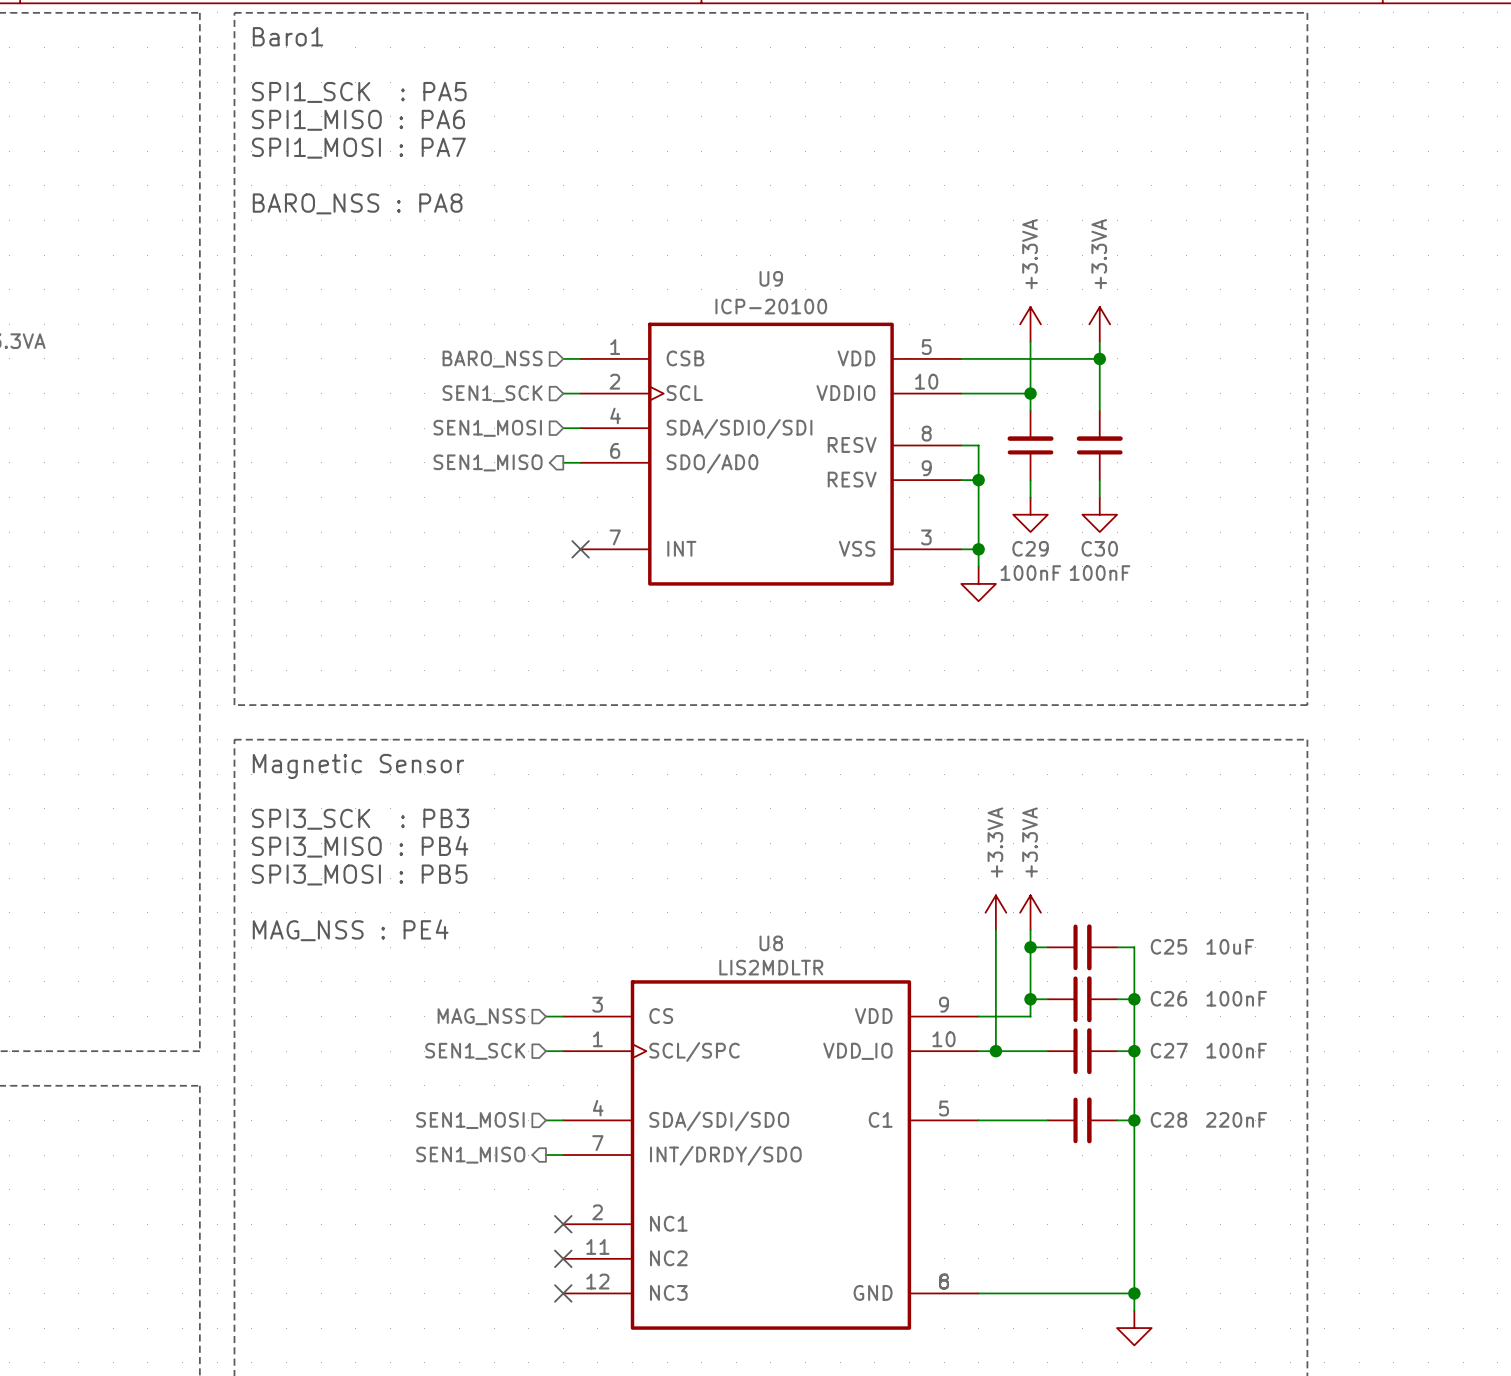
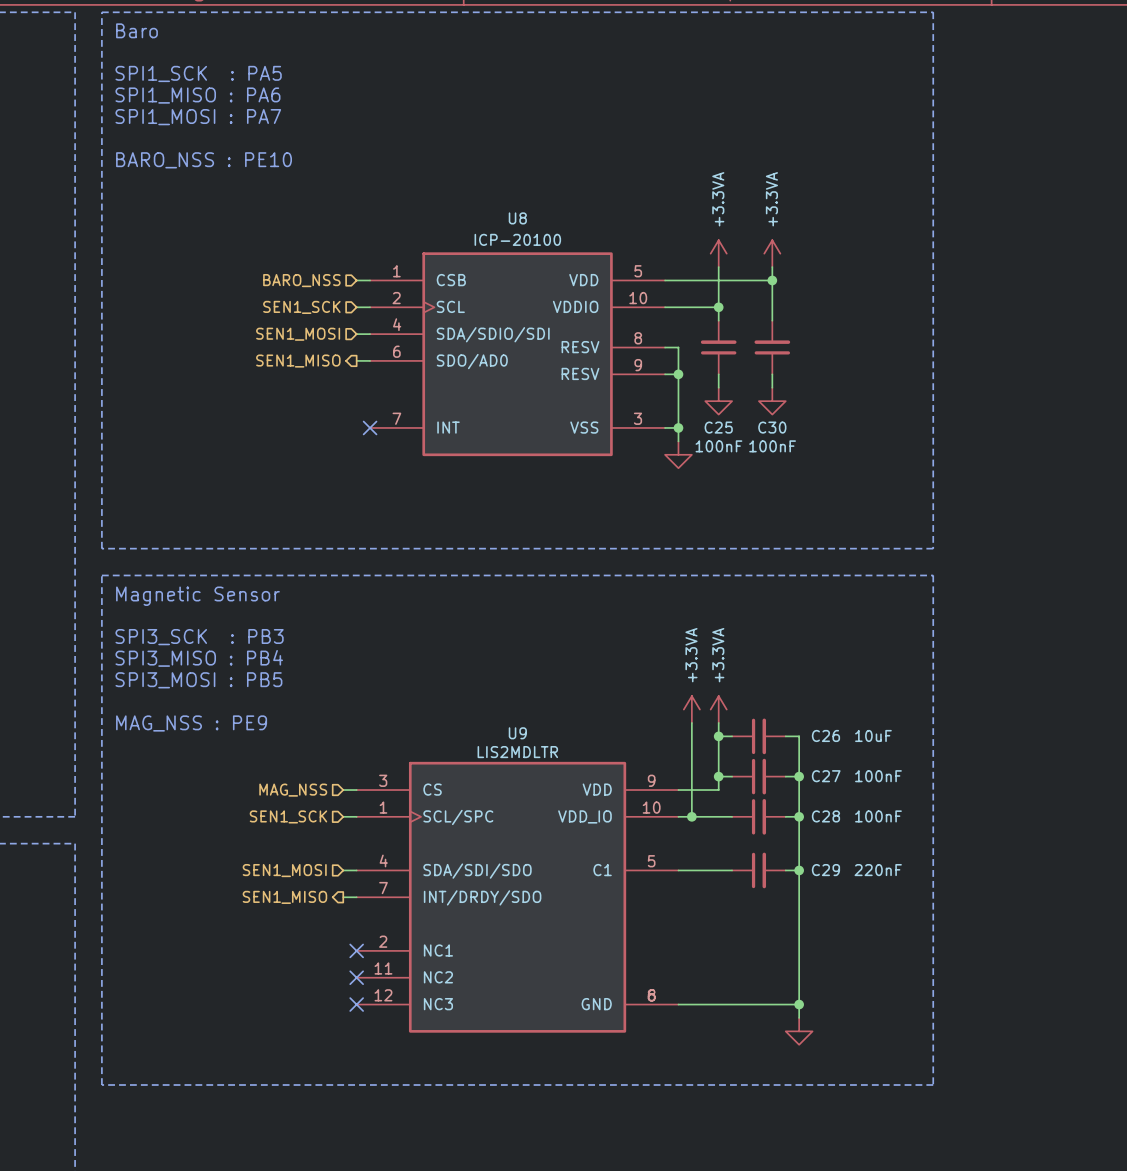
text: Baro1 (288, 36) -> Baro (136, 30)
text: BARO_NSS : PA8 (357, 203) -> BARO_NSS : PE10 (204, 160)
U9 name: U9 (771, 278) -> U8 (517, 218)
C29 name: C29 (1030, 548) -> C25 (718, 427)
text: MAG_NSS : PE4 (350, 930) -> MAG_NSS : PE9 (191, 723)
U8 name: U8 (771, 943) -> U9 (517, 733)
C25 name: C25 (1168, 946) -> C26 (825, 735)
C26 name: C26 (1168, 998) -> C27 (826, 776)
C27 name: C27 (1169, 1050) -> C28 (825, 816)
C28 name: C28 (1168, 1119) -> C29 (825, 870)

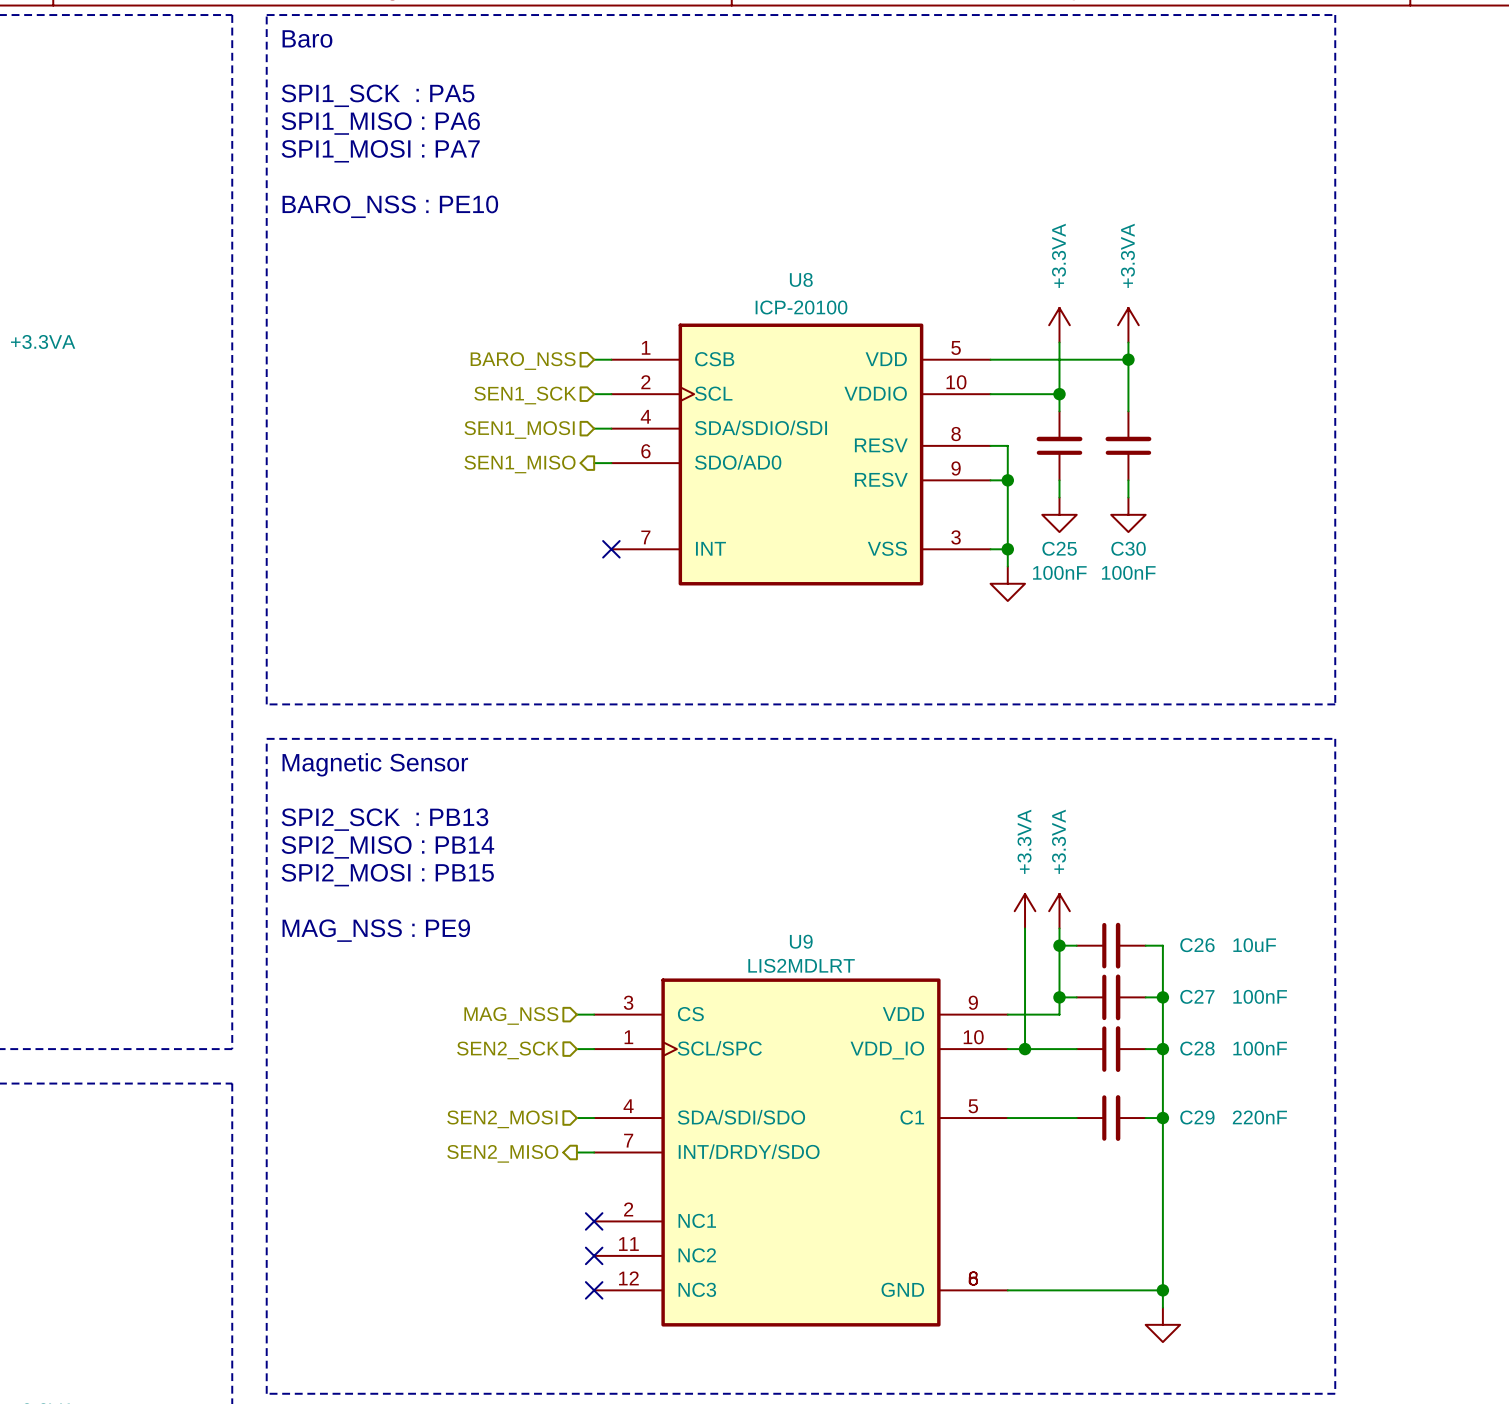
text: SPI3_SCK : PB3 (199, 637) -> SPI2_SCK : PB13 (384, 819)
text: SPI3_MISO : PB4 (199, 658) -> SPI2_MISO : PB14 (387, 847)
text: SPI3_MOSI : PB5 (198, 680) -> SPI2_MOSI : PB15 (387, 875)
U9 value: LIS2MDLTR (517, 752) -> LIS2MDLRT (801, 965)
hierarchical label: SEN1_SCK (288, 816) -> SEN2_SCK (508, 1050)
hierarchical label: SEN1_MOSI (284, 870) -> SEN2_MOSI (502, 1119)
hierarchical label: SEN1_MISO (284, 897) -> SEN2_MISO (502, 1153)

